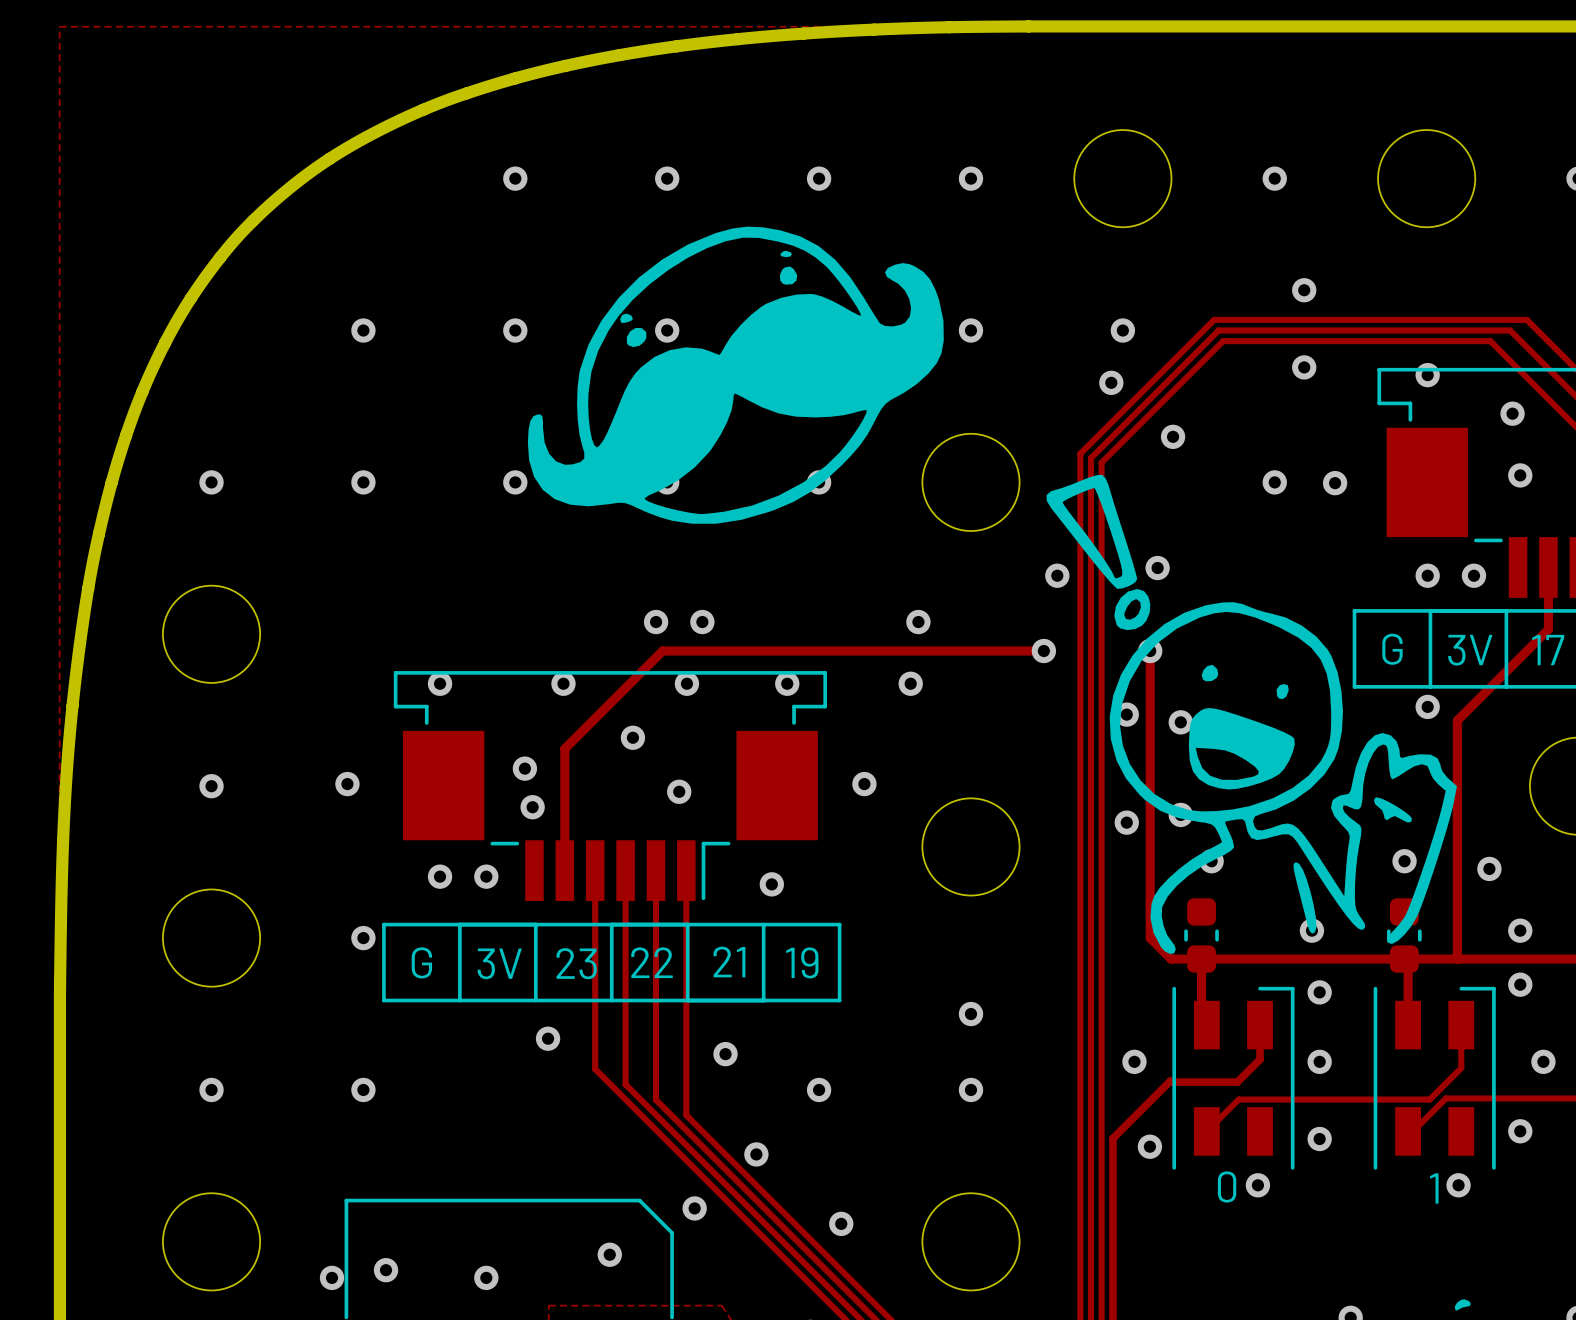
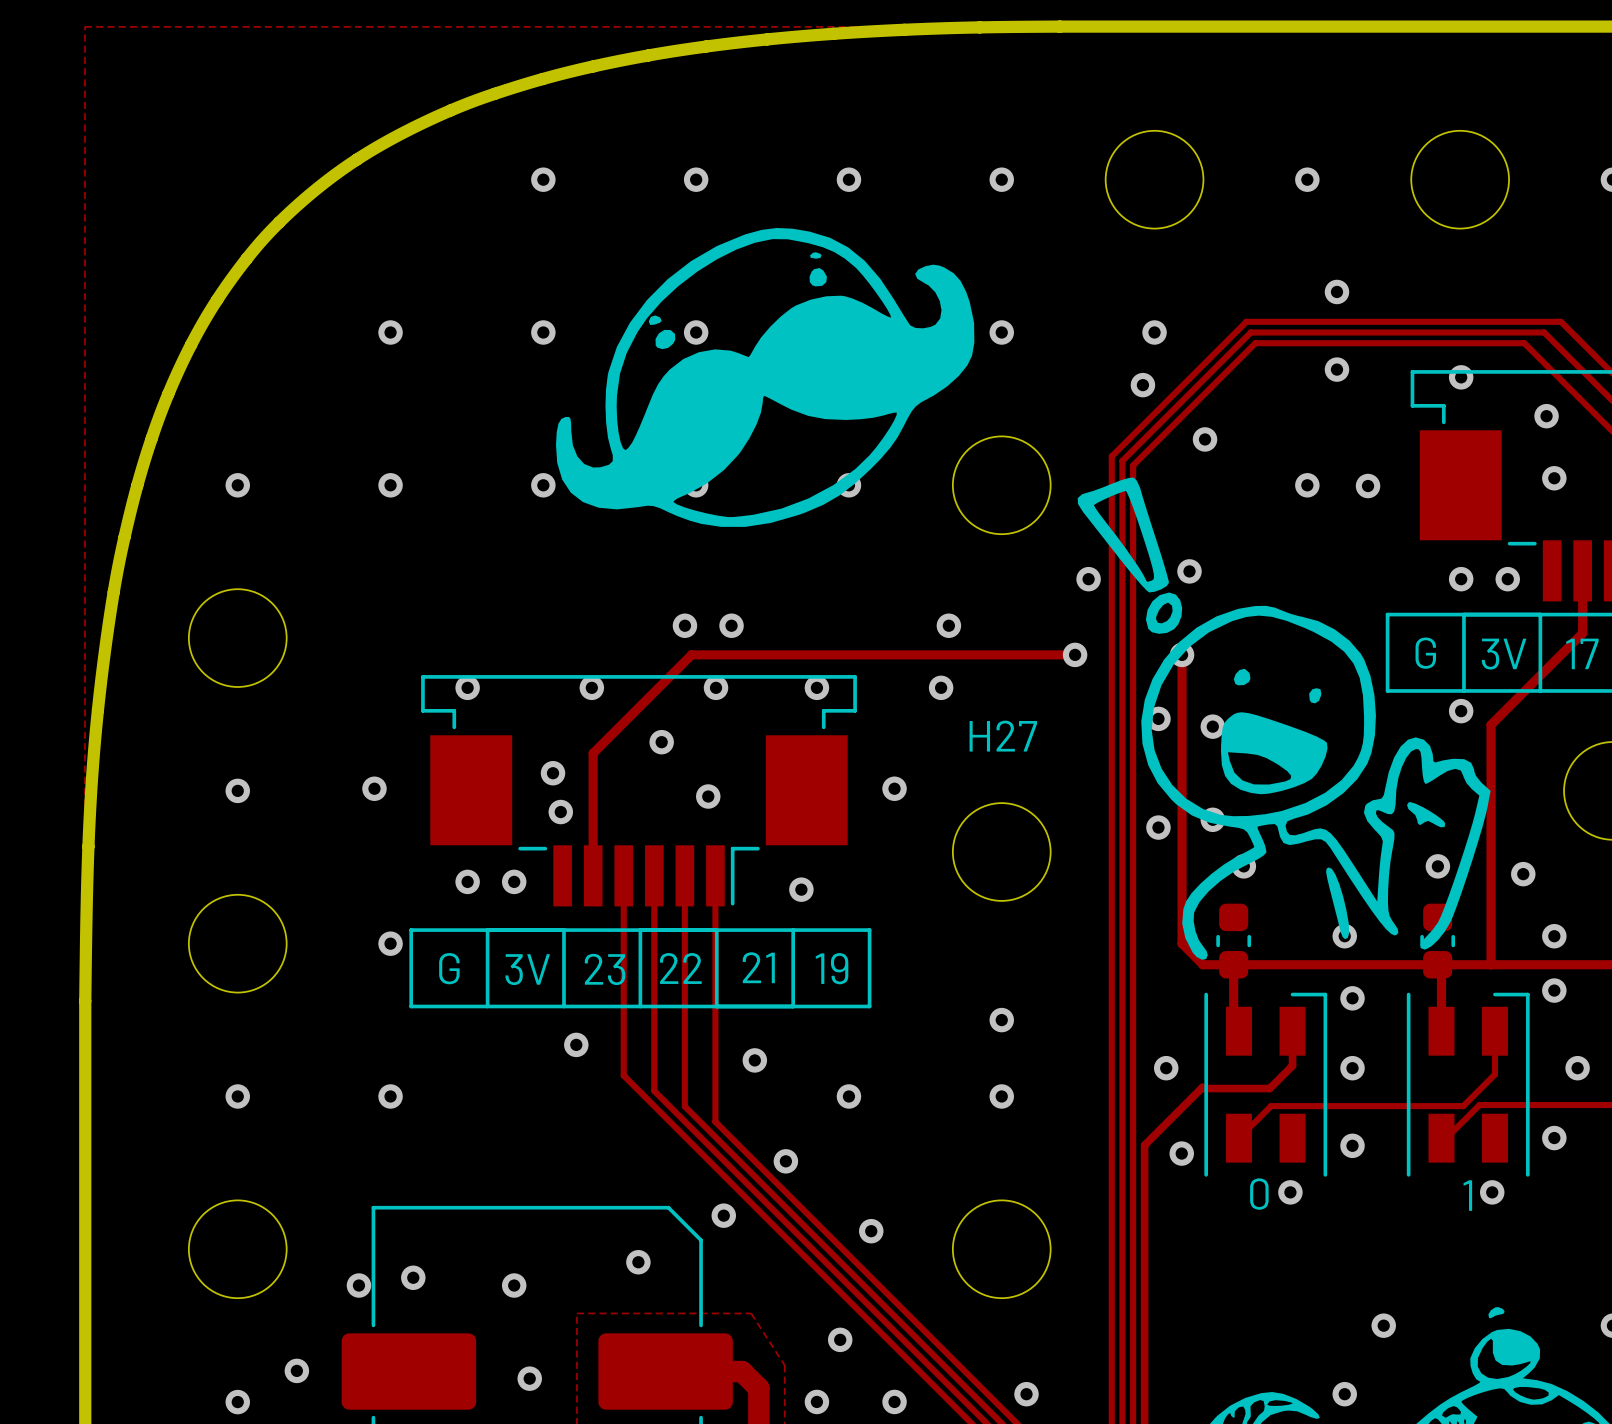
H27 name: none -> H27 (1003, 736)

